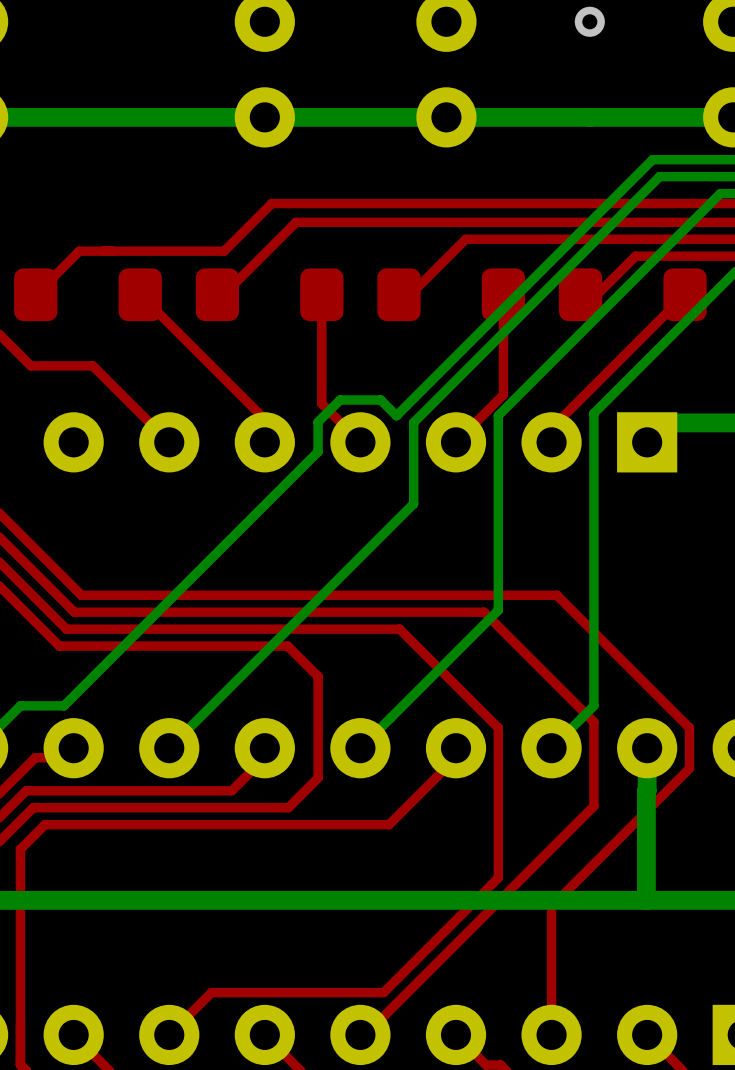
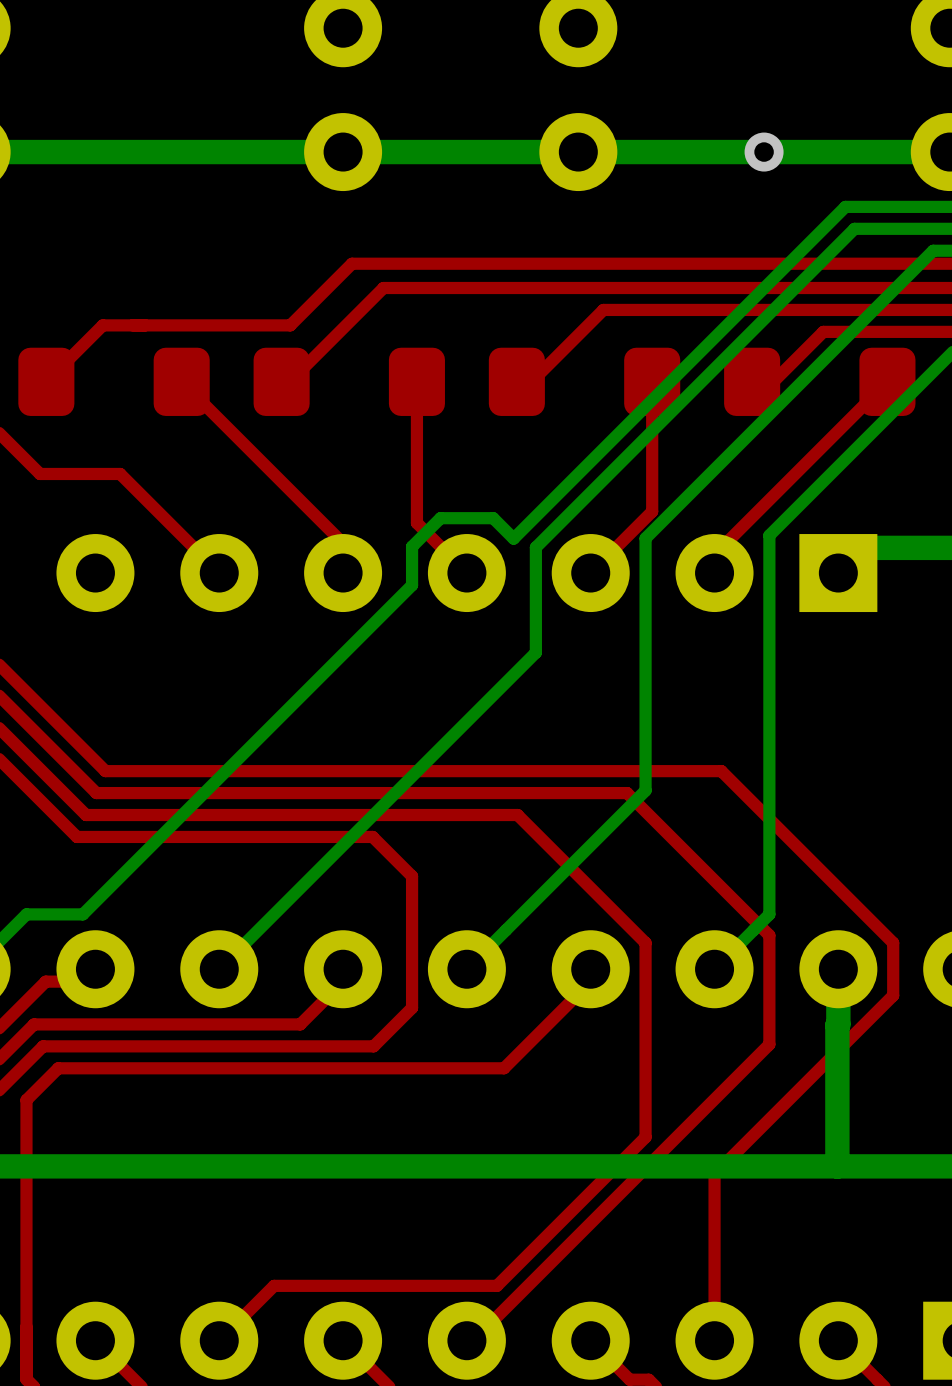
via position: (589, 21) -> (764, 152)

